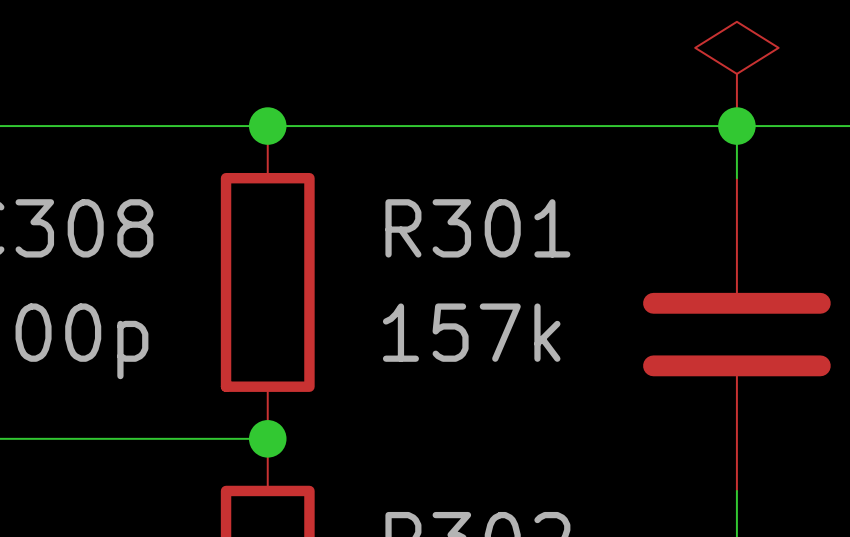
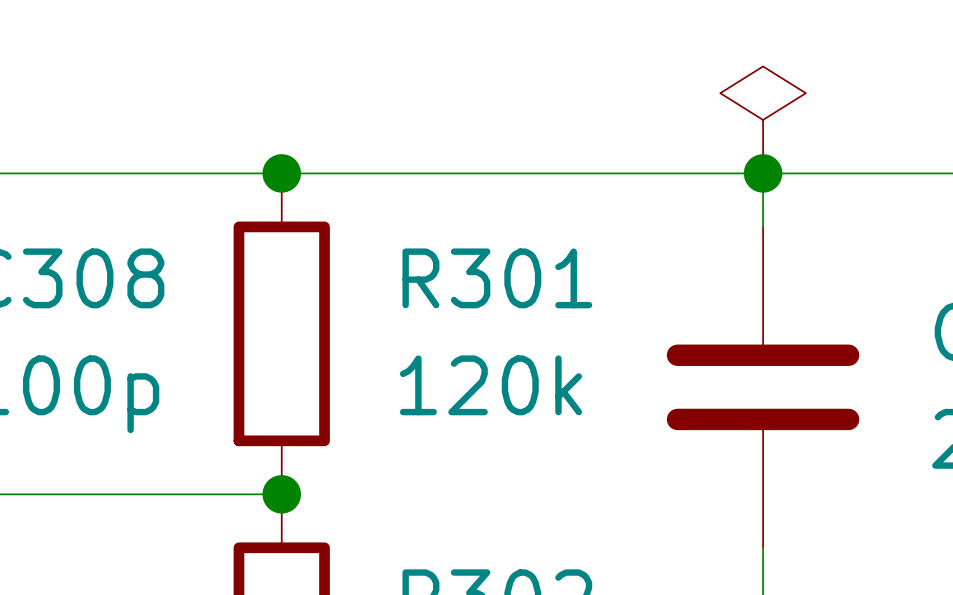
R301 value: 157k (471, 332) -> 120k (490, 385)

